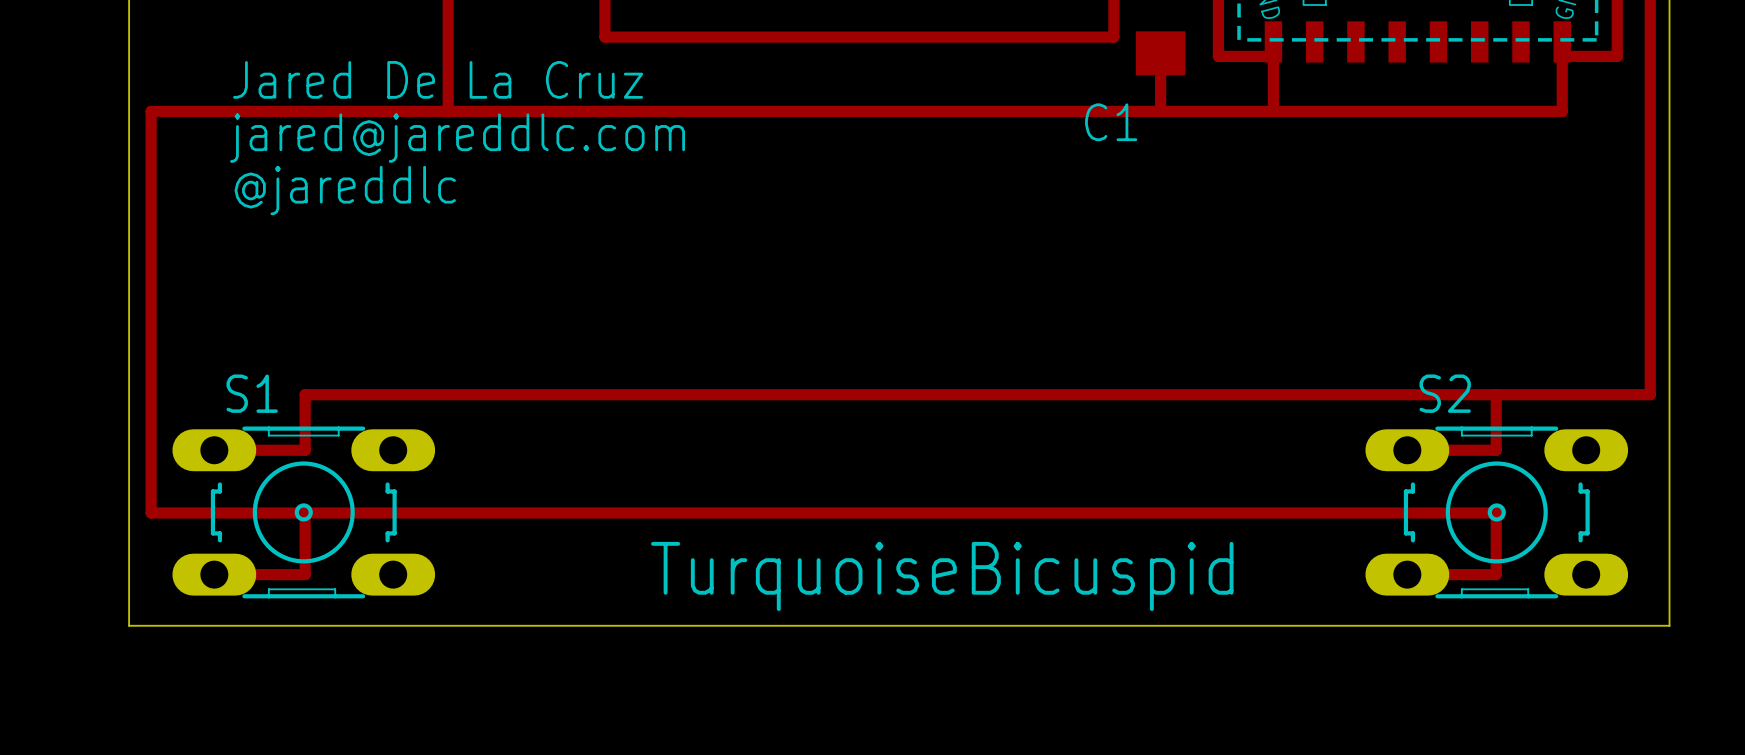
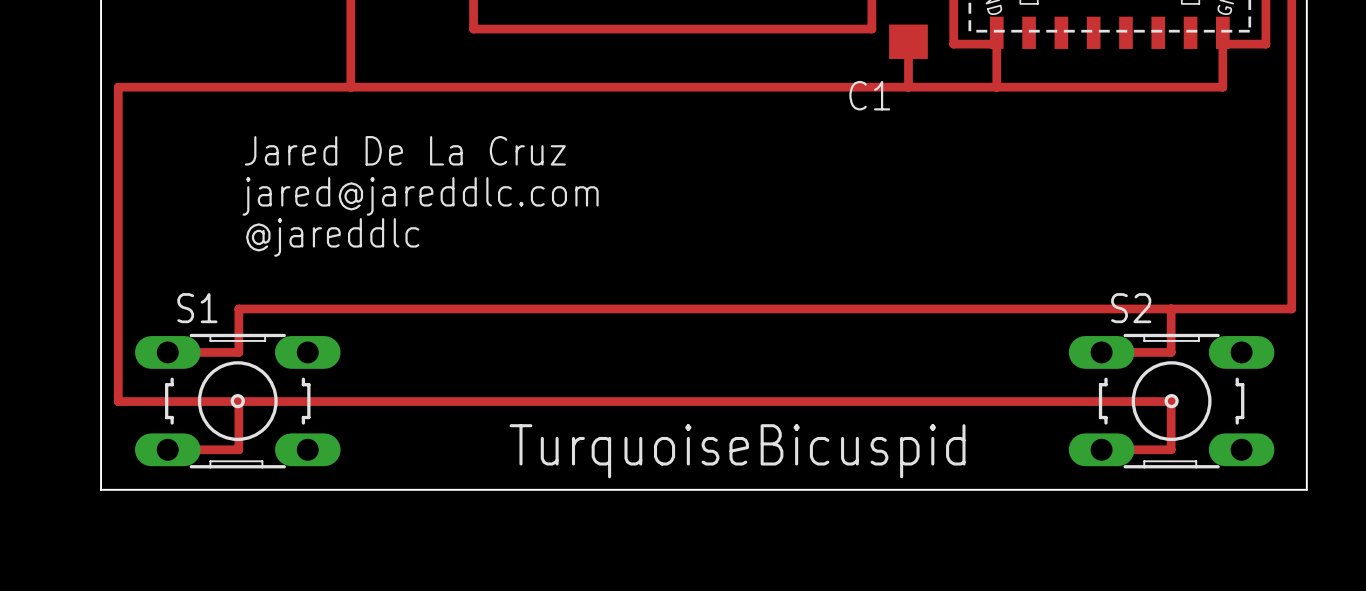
text position: Jared De La Cruz (438, 79) -> Jared De La Cruz (405, 150)
text position: jared@jareddlc.com (457, 138) -> jared@jareddlc.com (420, 196)
text position: @jareddlc (345, 190) -> @jareddlc (332, 237)

